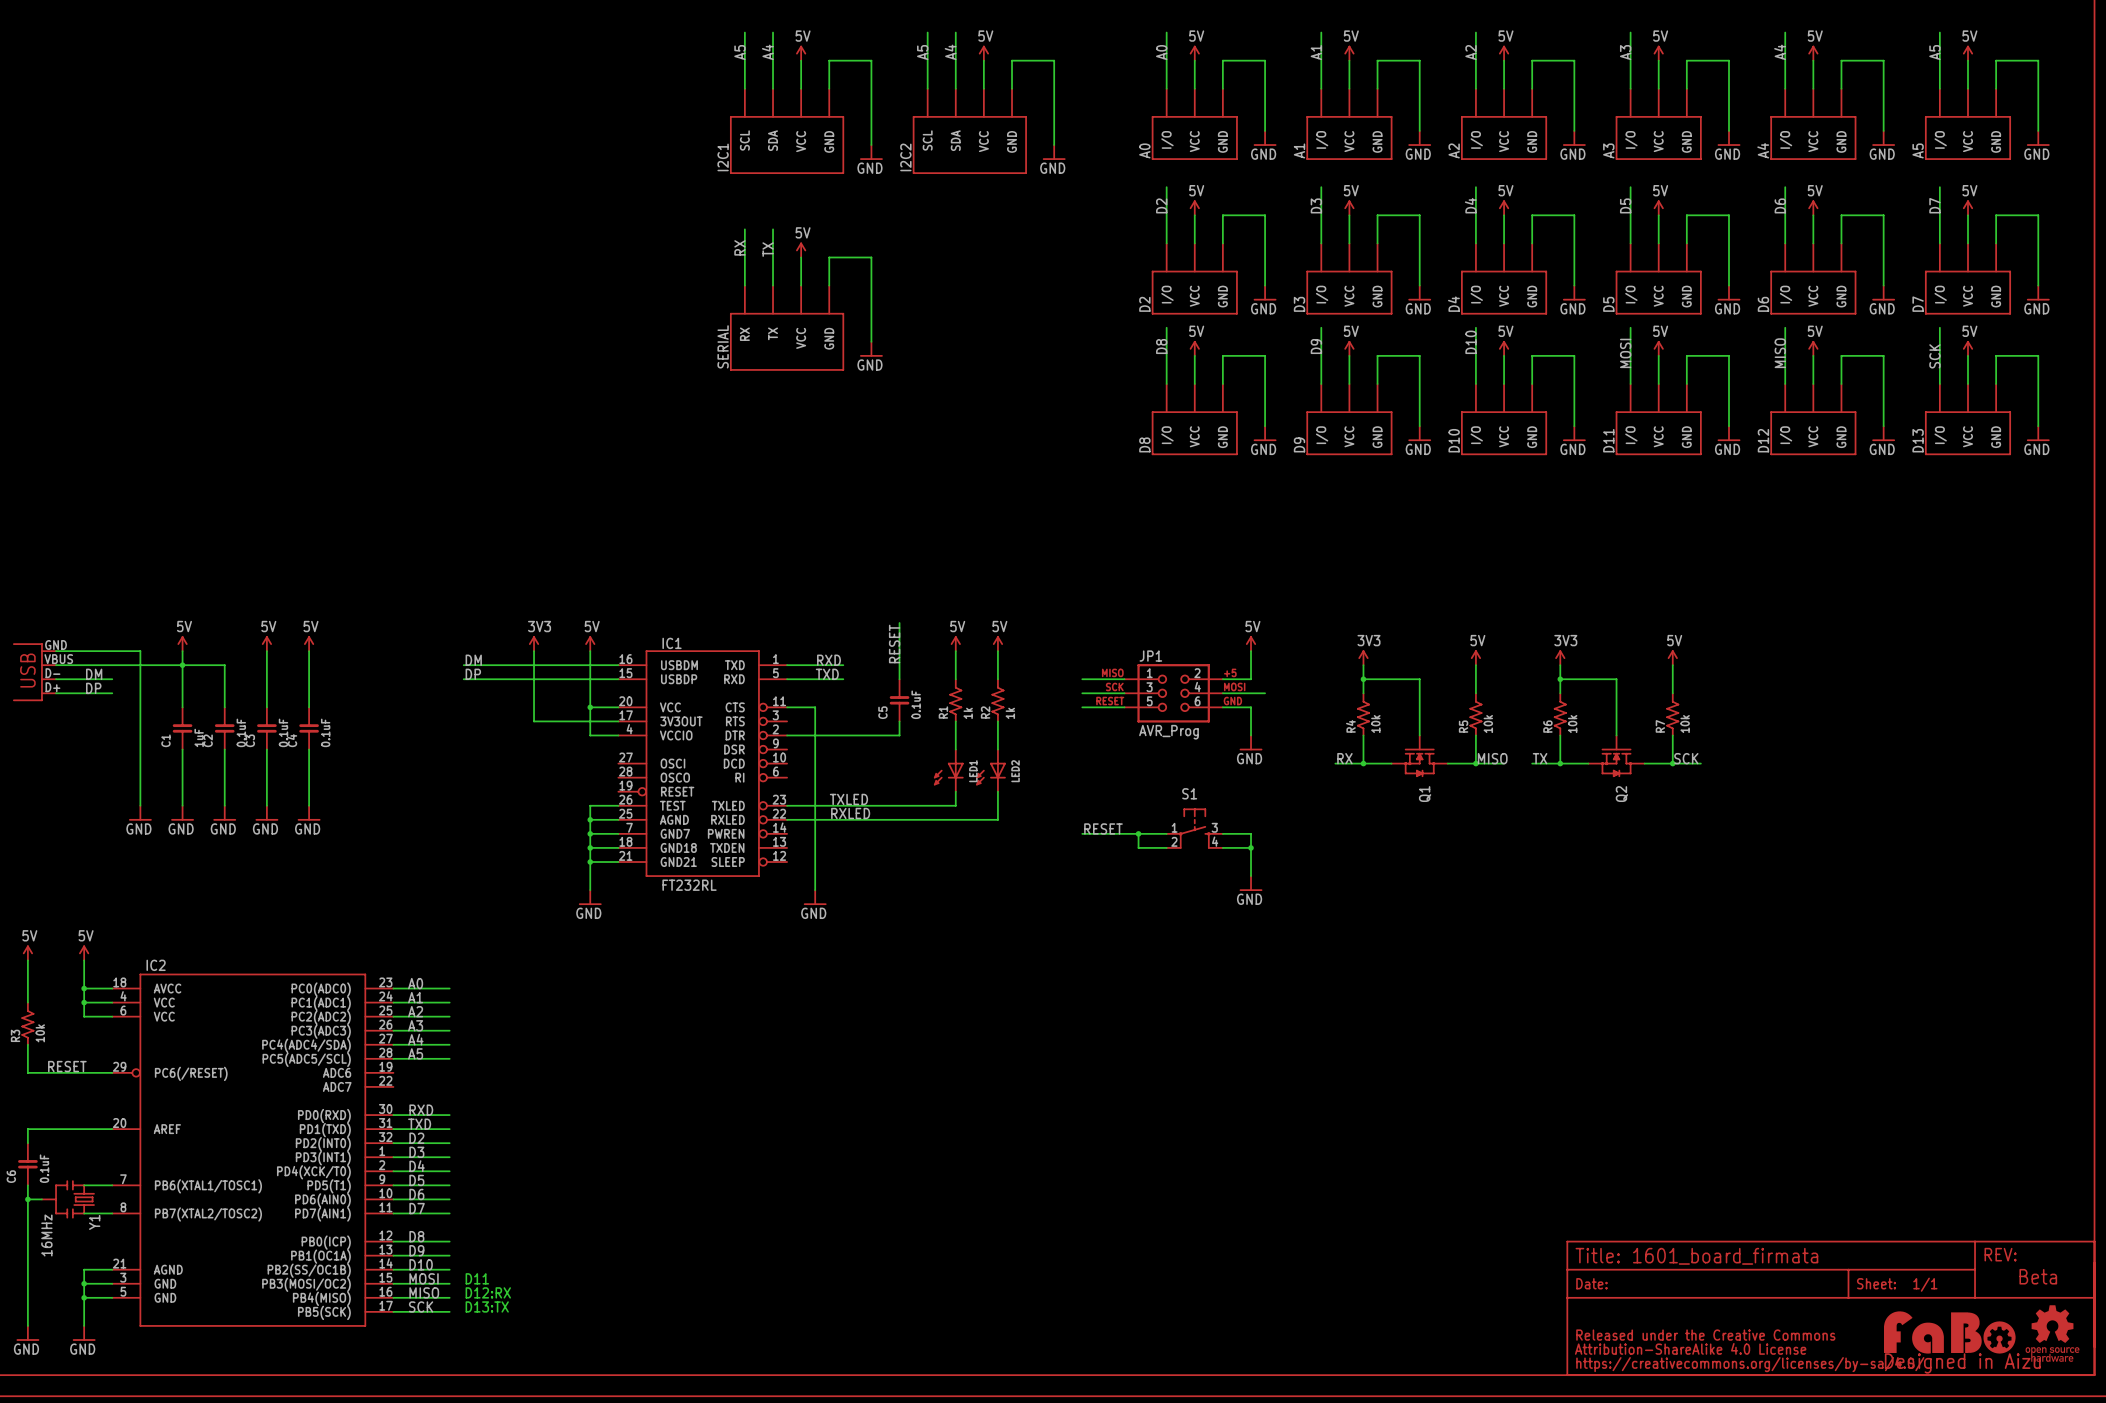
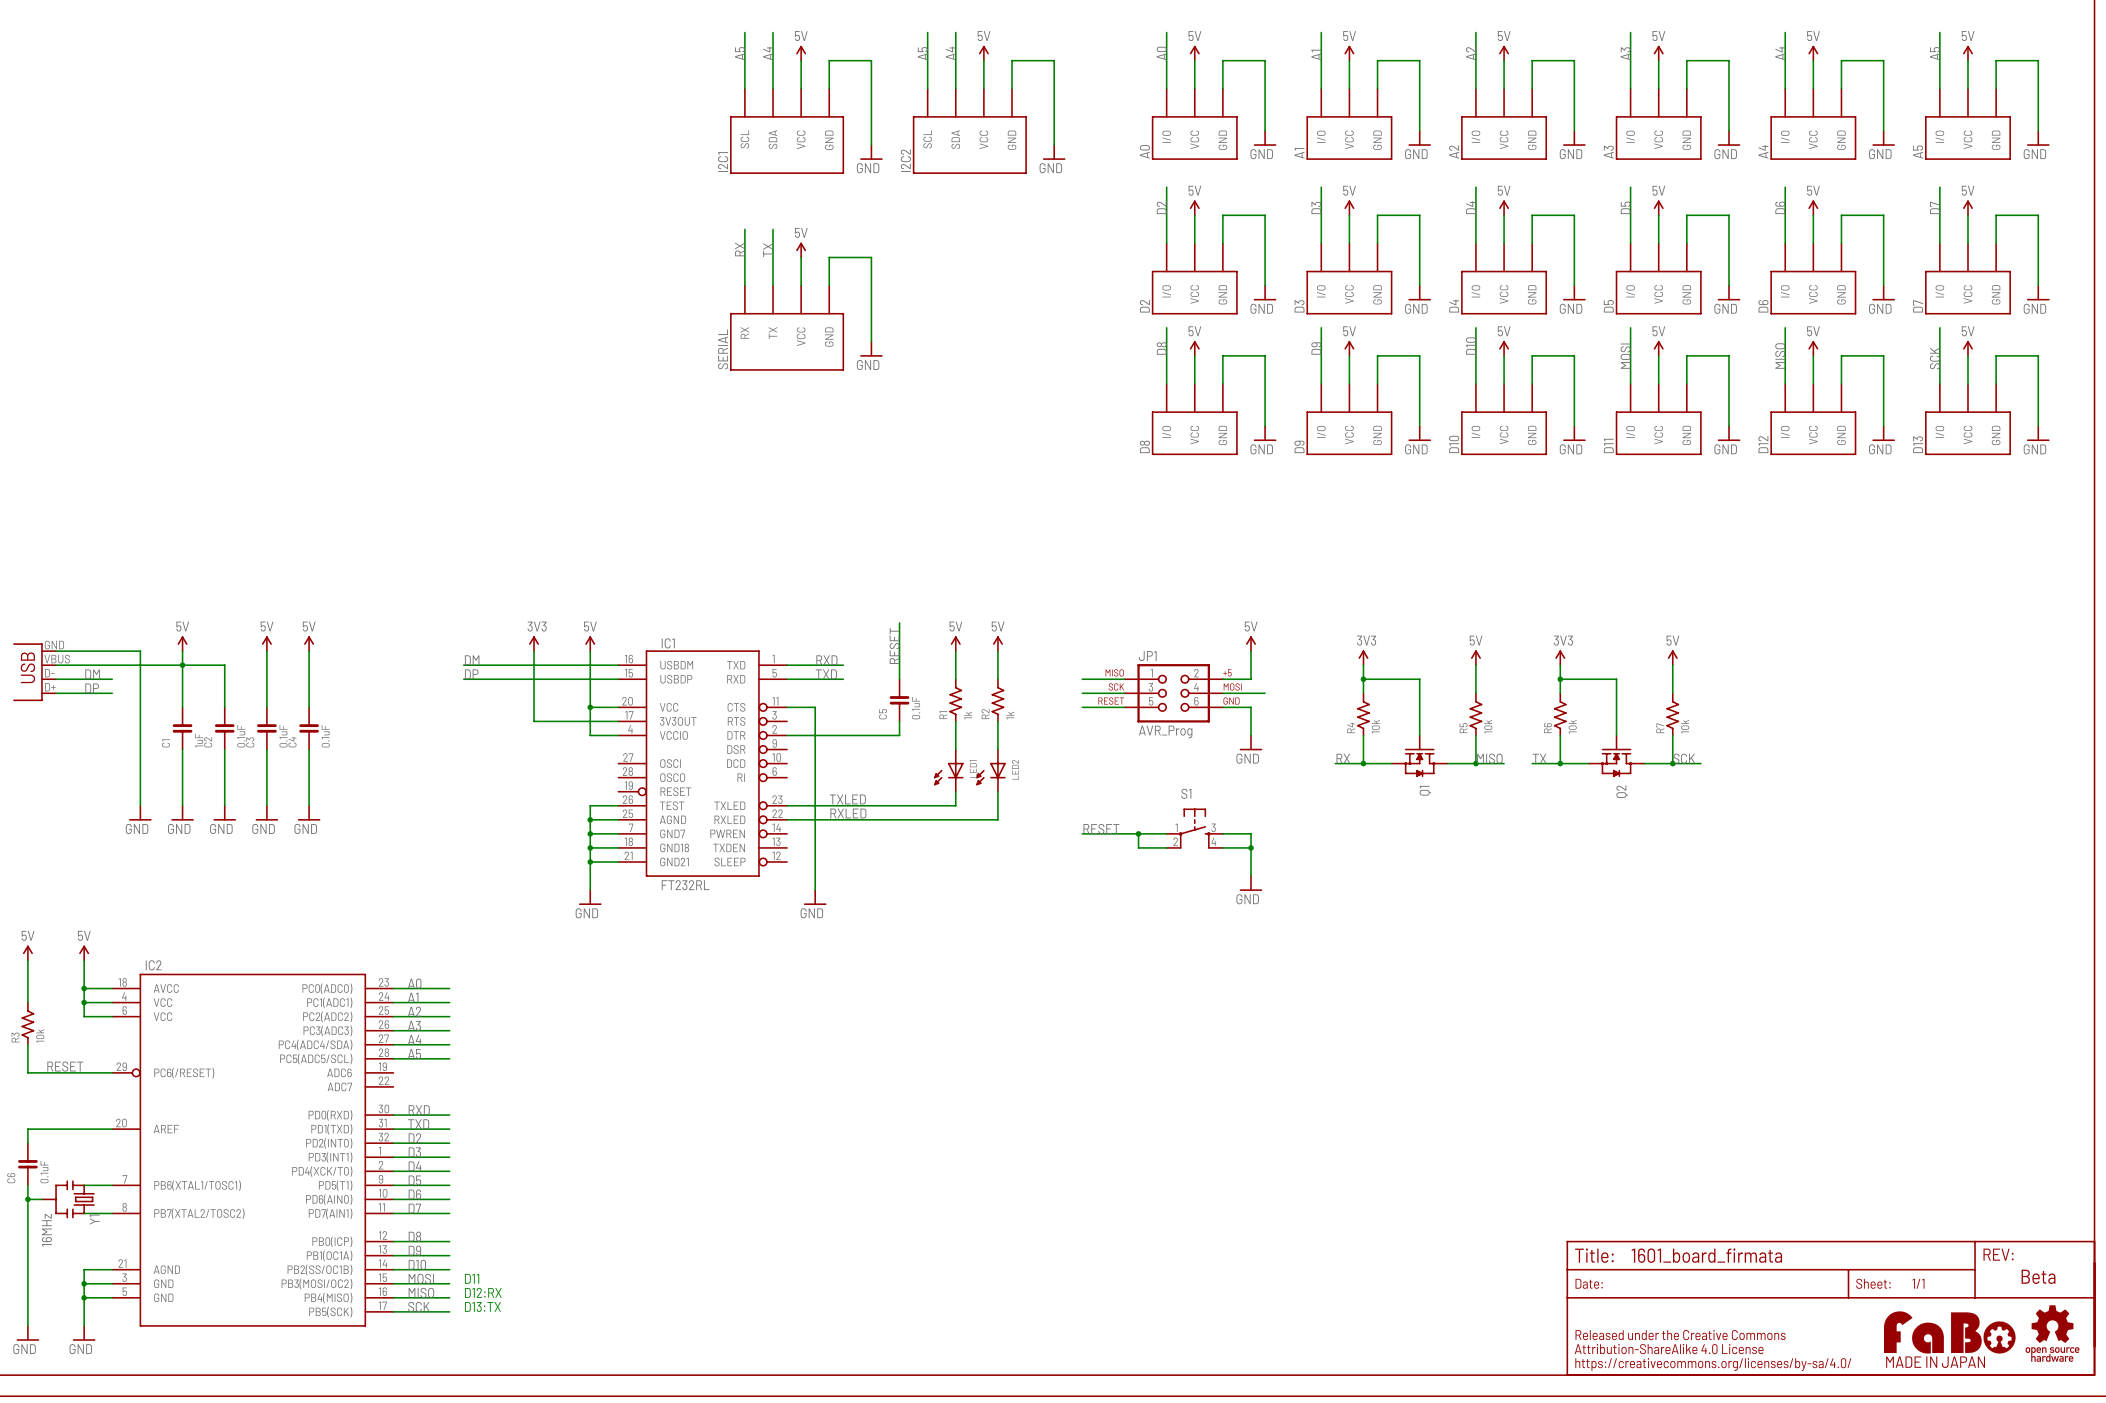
part text: none -> MADE IN JAPAN (1935, 1362)
part text: Designed in Aizu (1962, 1363) -> none

